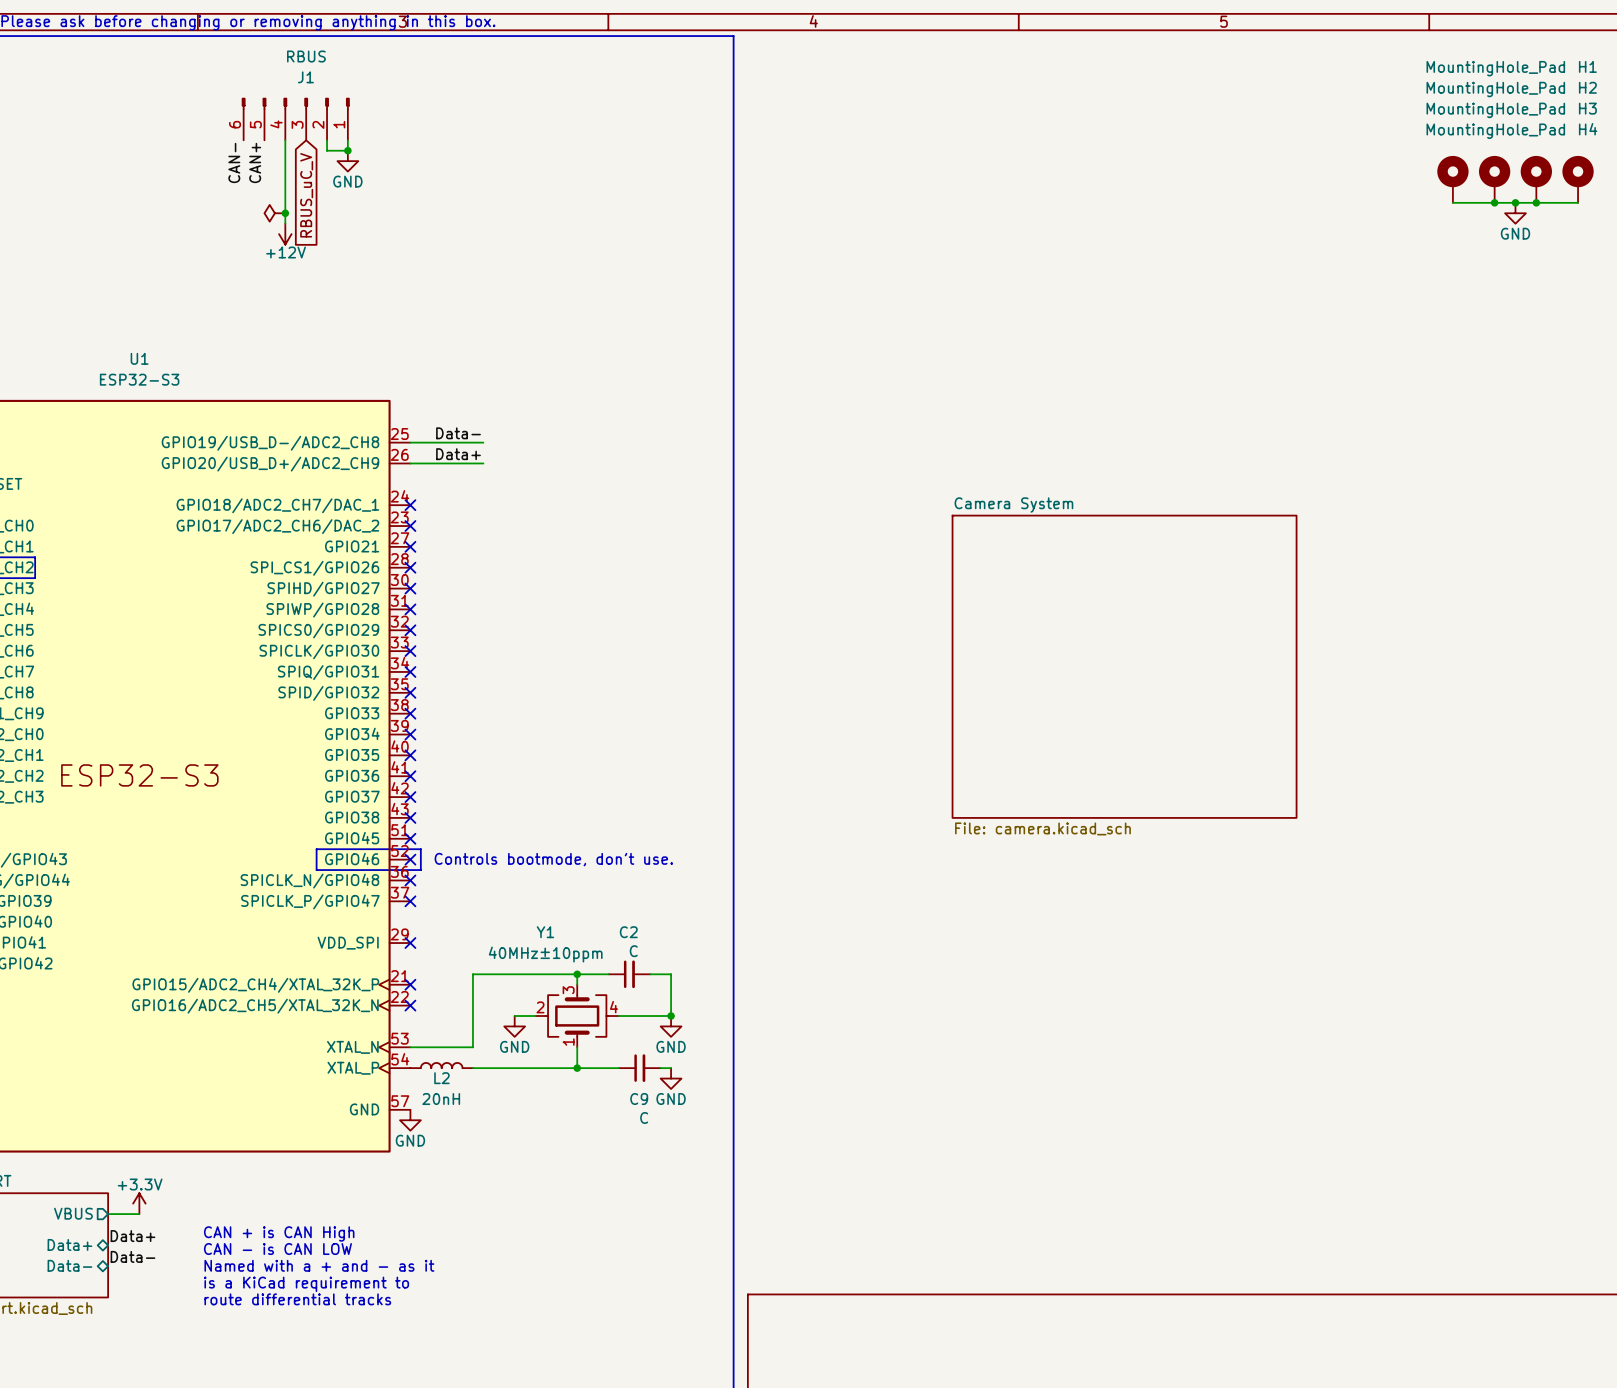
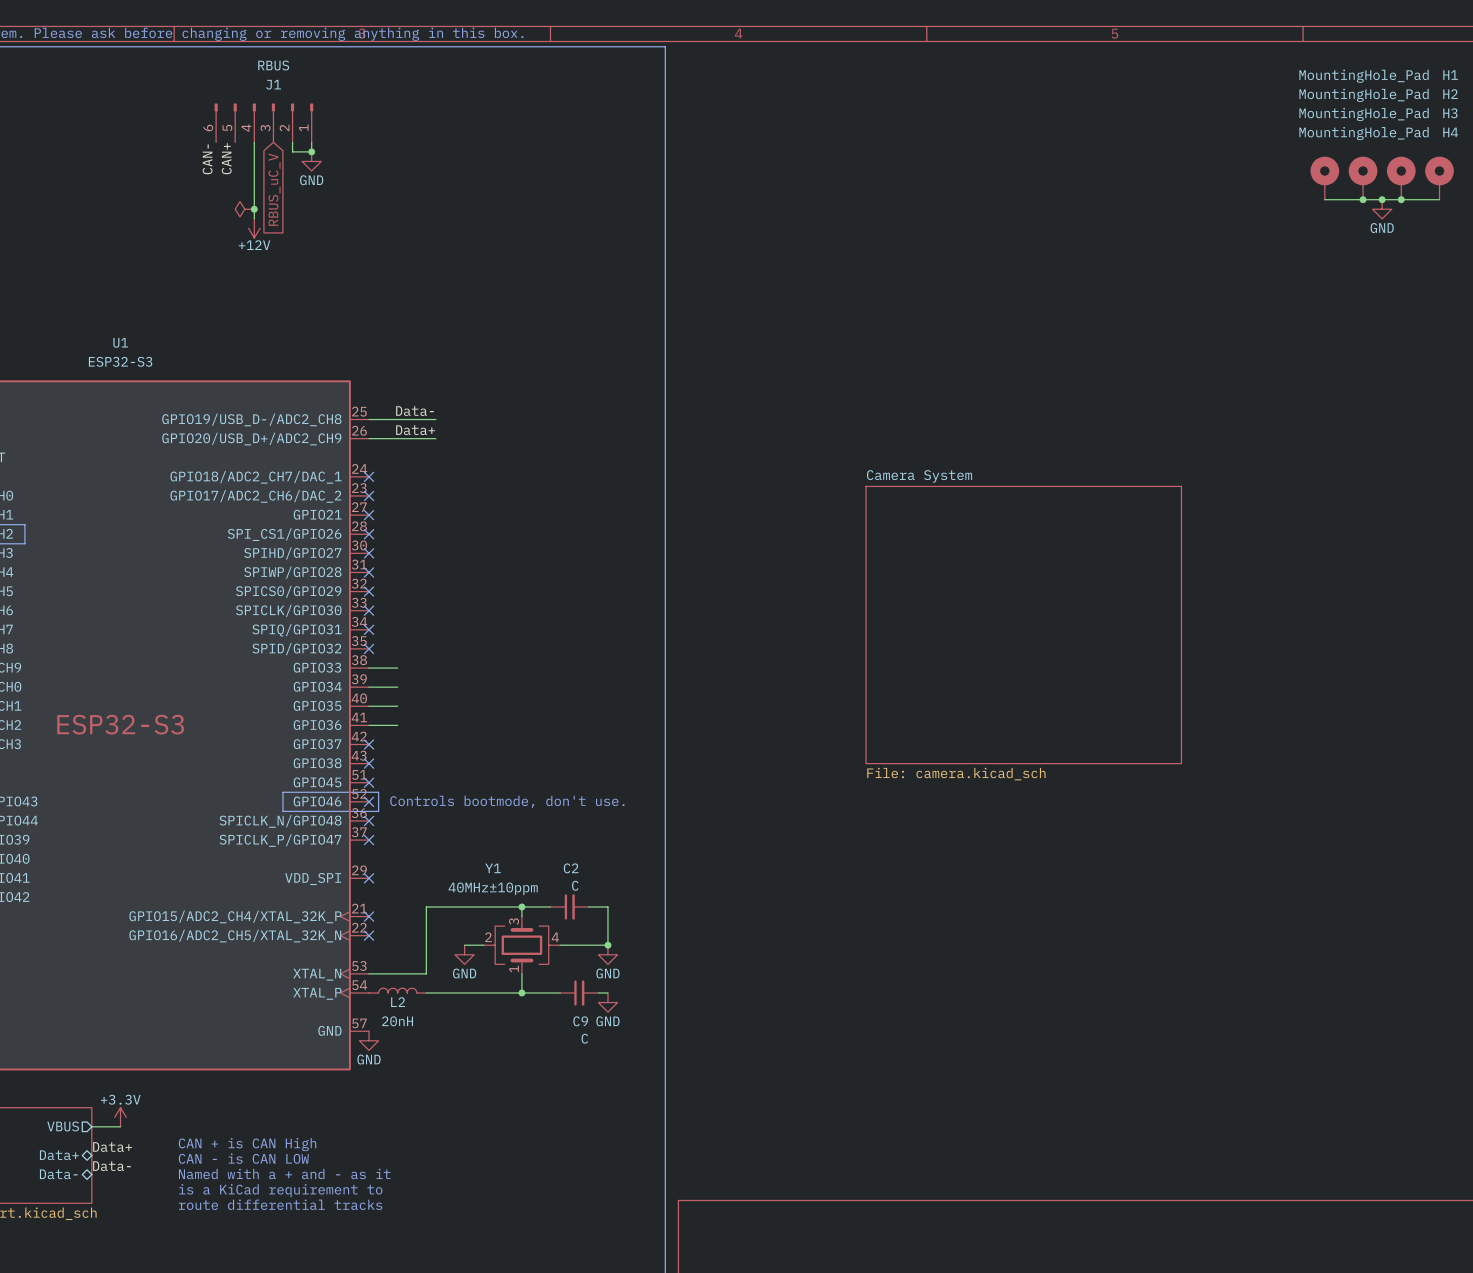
wire: none -> (369, 668) (397, 668)
no-connect mark: (410, 713) -> none
wire: none -> (369, 687) (397, 687)
no-connect mark: (410, 734) -> none
wire: none -> (369, 706) (397, 706)
no-connect mark: (410, 755) -> none
wire: none -> (369, 725) (397, 725)
no-connect mark: (410, 776) -> none

